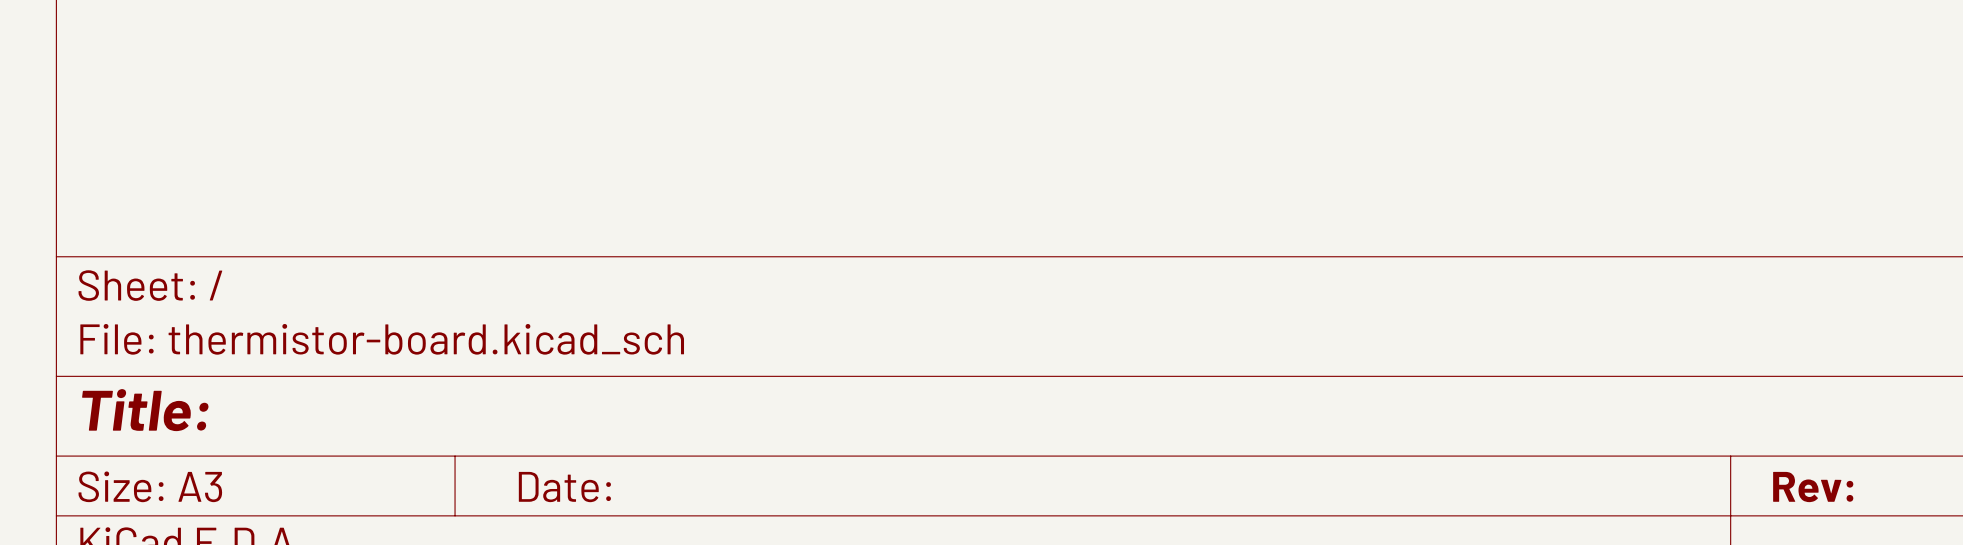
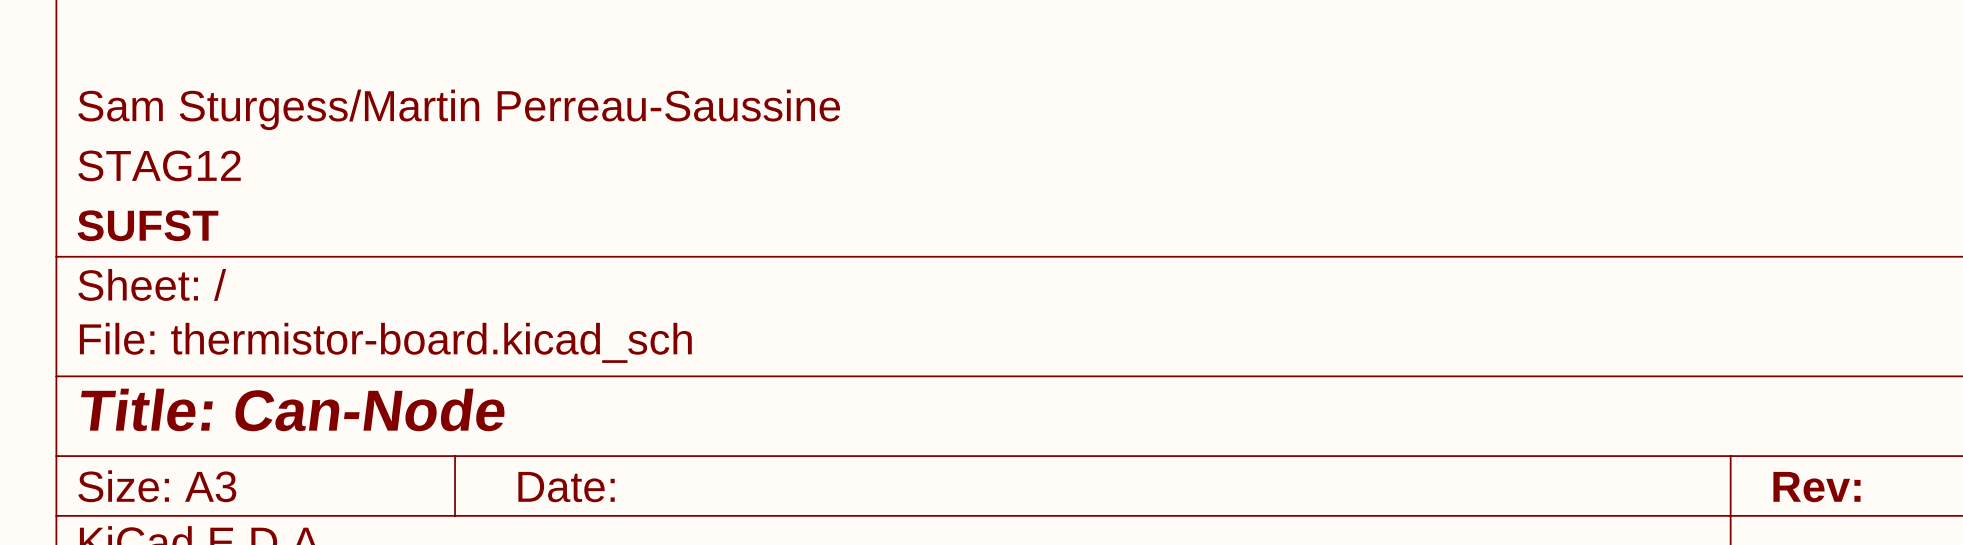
title block: none -> Sam Sturgess/Martin Perreau-Saussine (459, 109)
title block: none -> STAG12 (159, 165)
title block: none -> SUFST (147, 225)
title block: Title: (145, 410) -> Title: Can-Node (293, 409)

